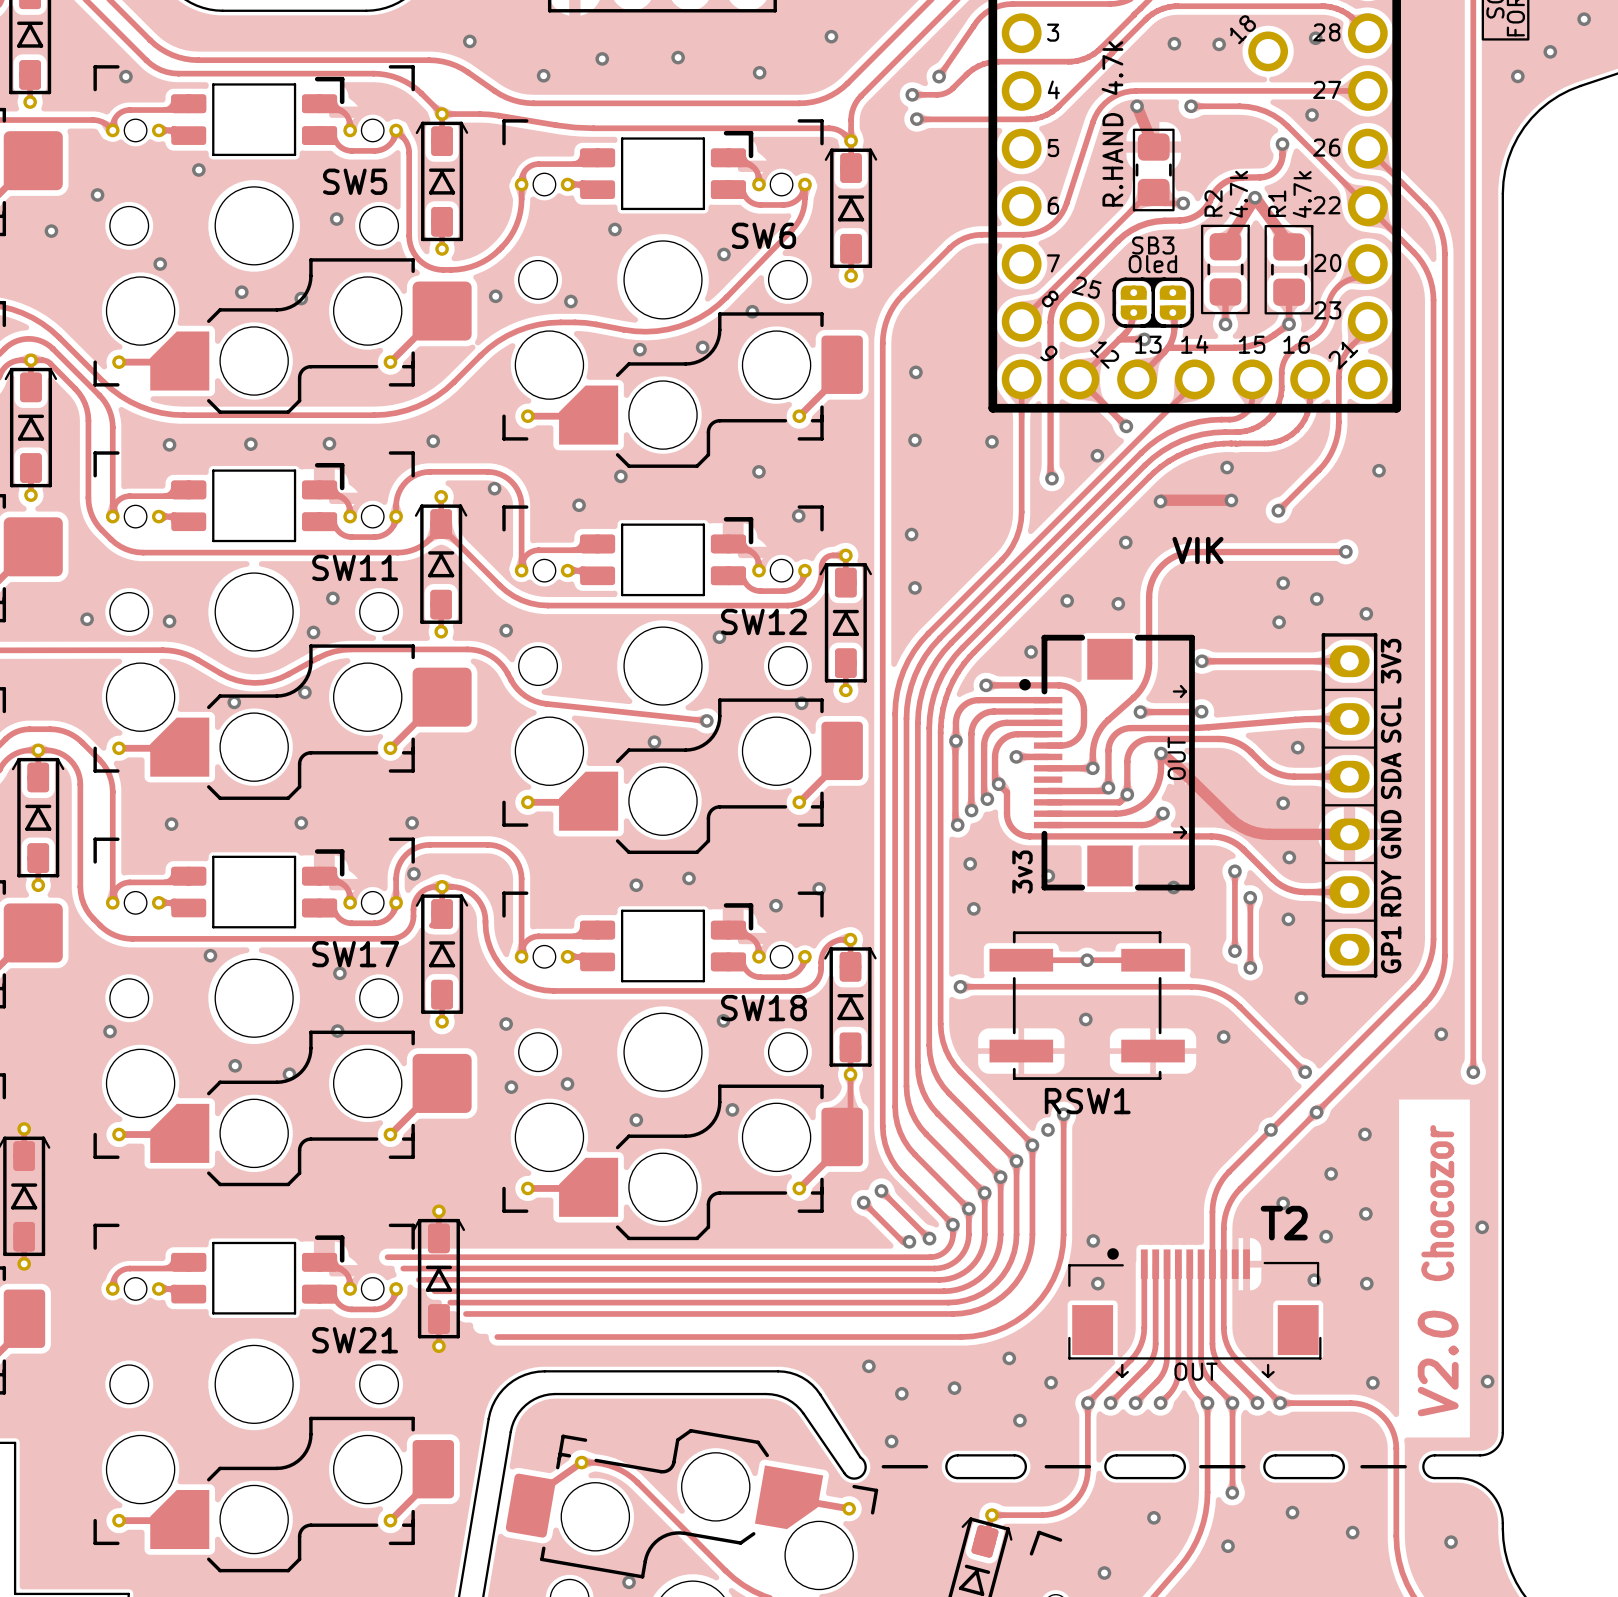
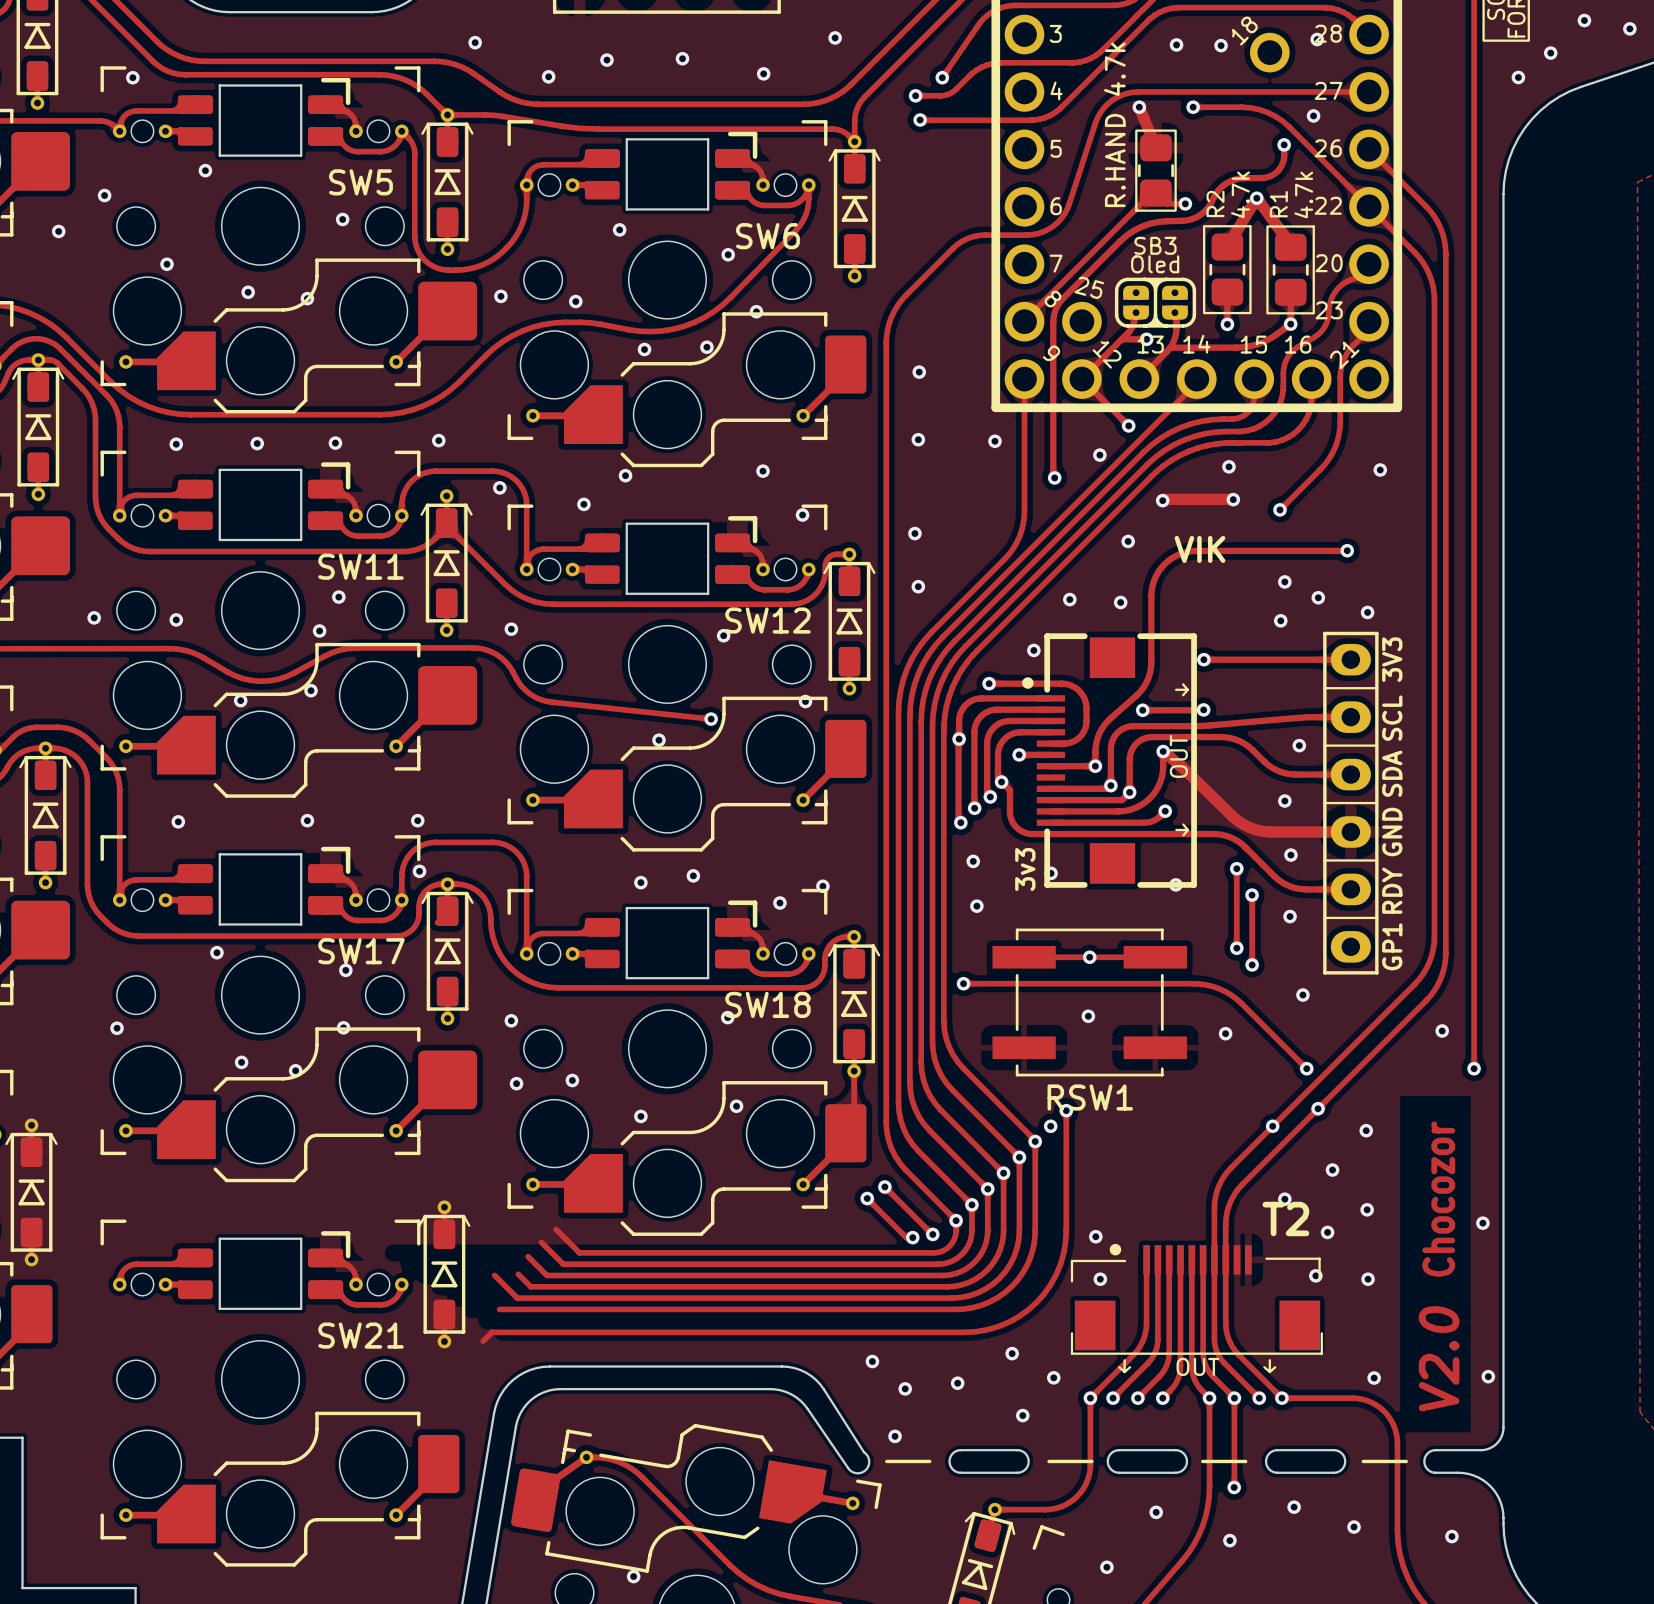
track: (387, 1257) (574, 1257) -> (556, 1229) (579, 1252)
track: (403, 1268) (558, 1268) -> (541, 1242) (563, 1264)
track: (418, 1279) (541, 1279) -> (528, 1256) (546, 1275)
track: (434, 1291) (525, 1291) -> (518, 1274) (530, 1286)
track: (450, 1302) (512, 1302) -> (494, 1275) (517, 1298)
track: (465, 1313) (494, 1313) -> none
track: none -> (502, 1332) (491, 1332) (483, 1341)

